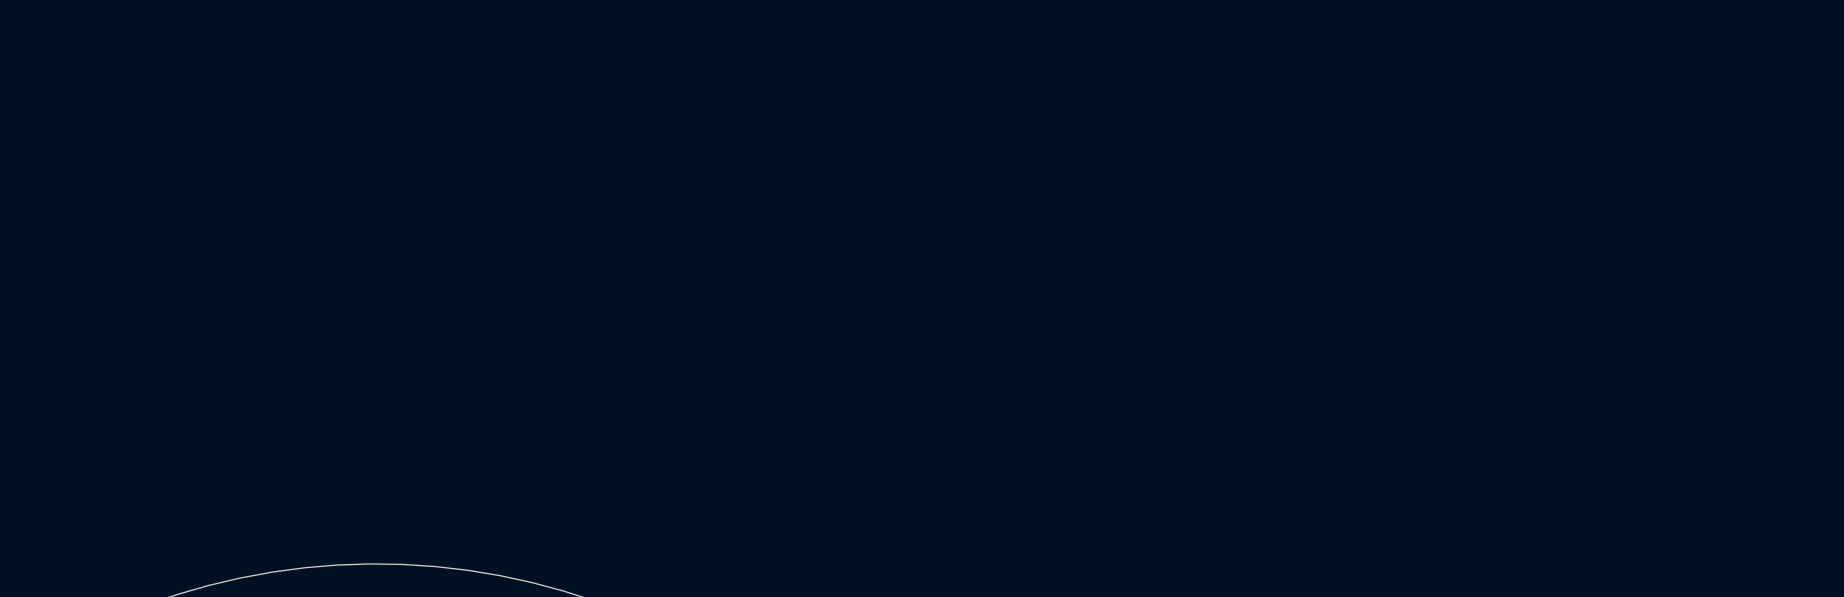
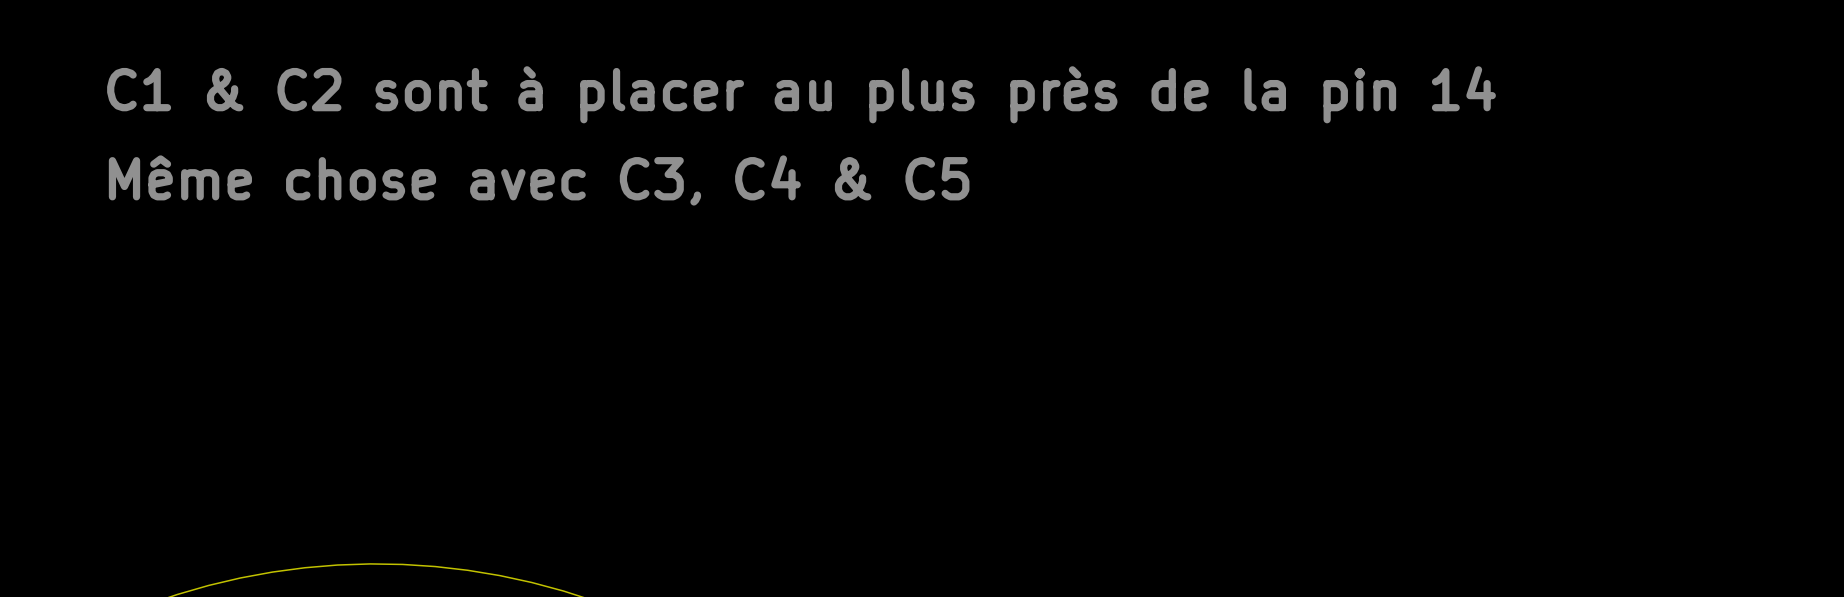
text: none -> C1 & C2 sont à placer au plus près de la pin 14 (801, 94)
text: none -> Même chose avec C3, C4 & C5 (539, 180)

